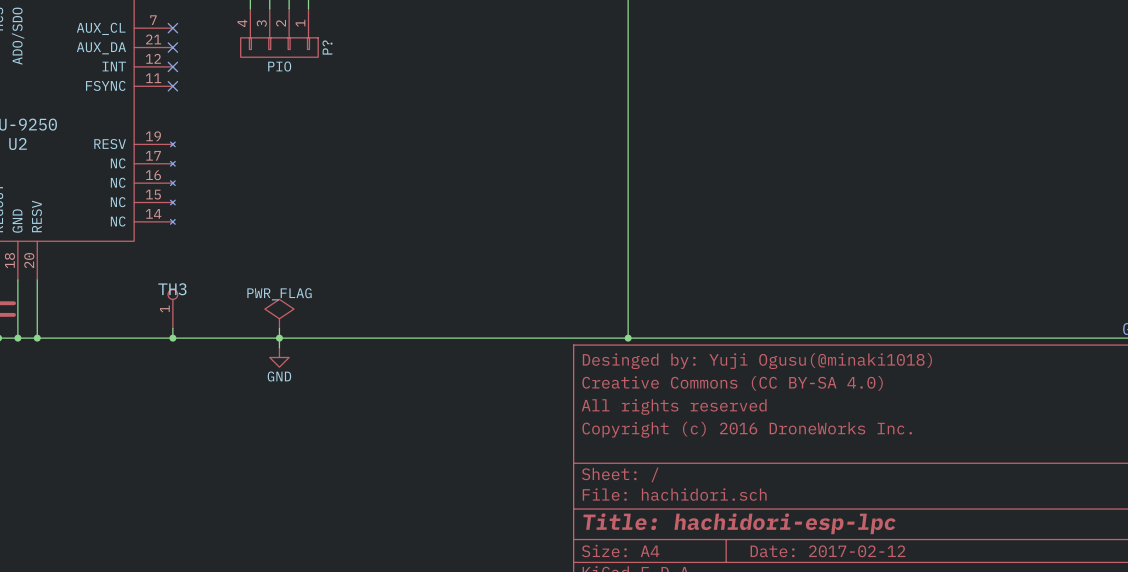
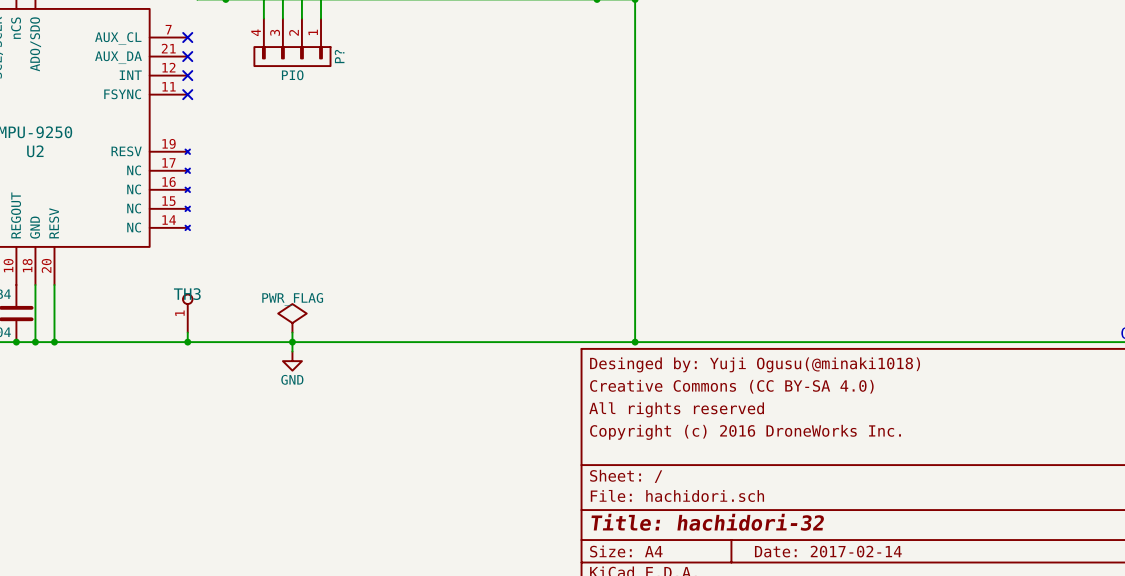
title block: Title: hachidori-esp-lpc (739, 523) -> Title: hachidori-32 (707, 522)
title block: Date: 2017-02-12 (828, 551) -> Date: 2017-02-14 (828, 551)

